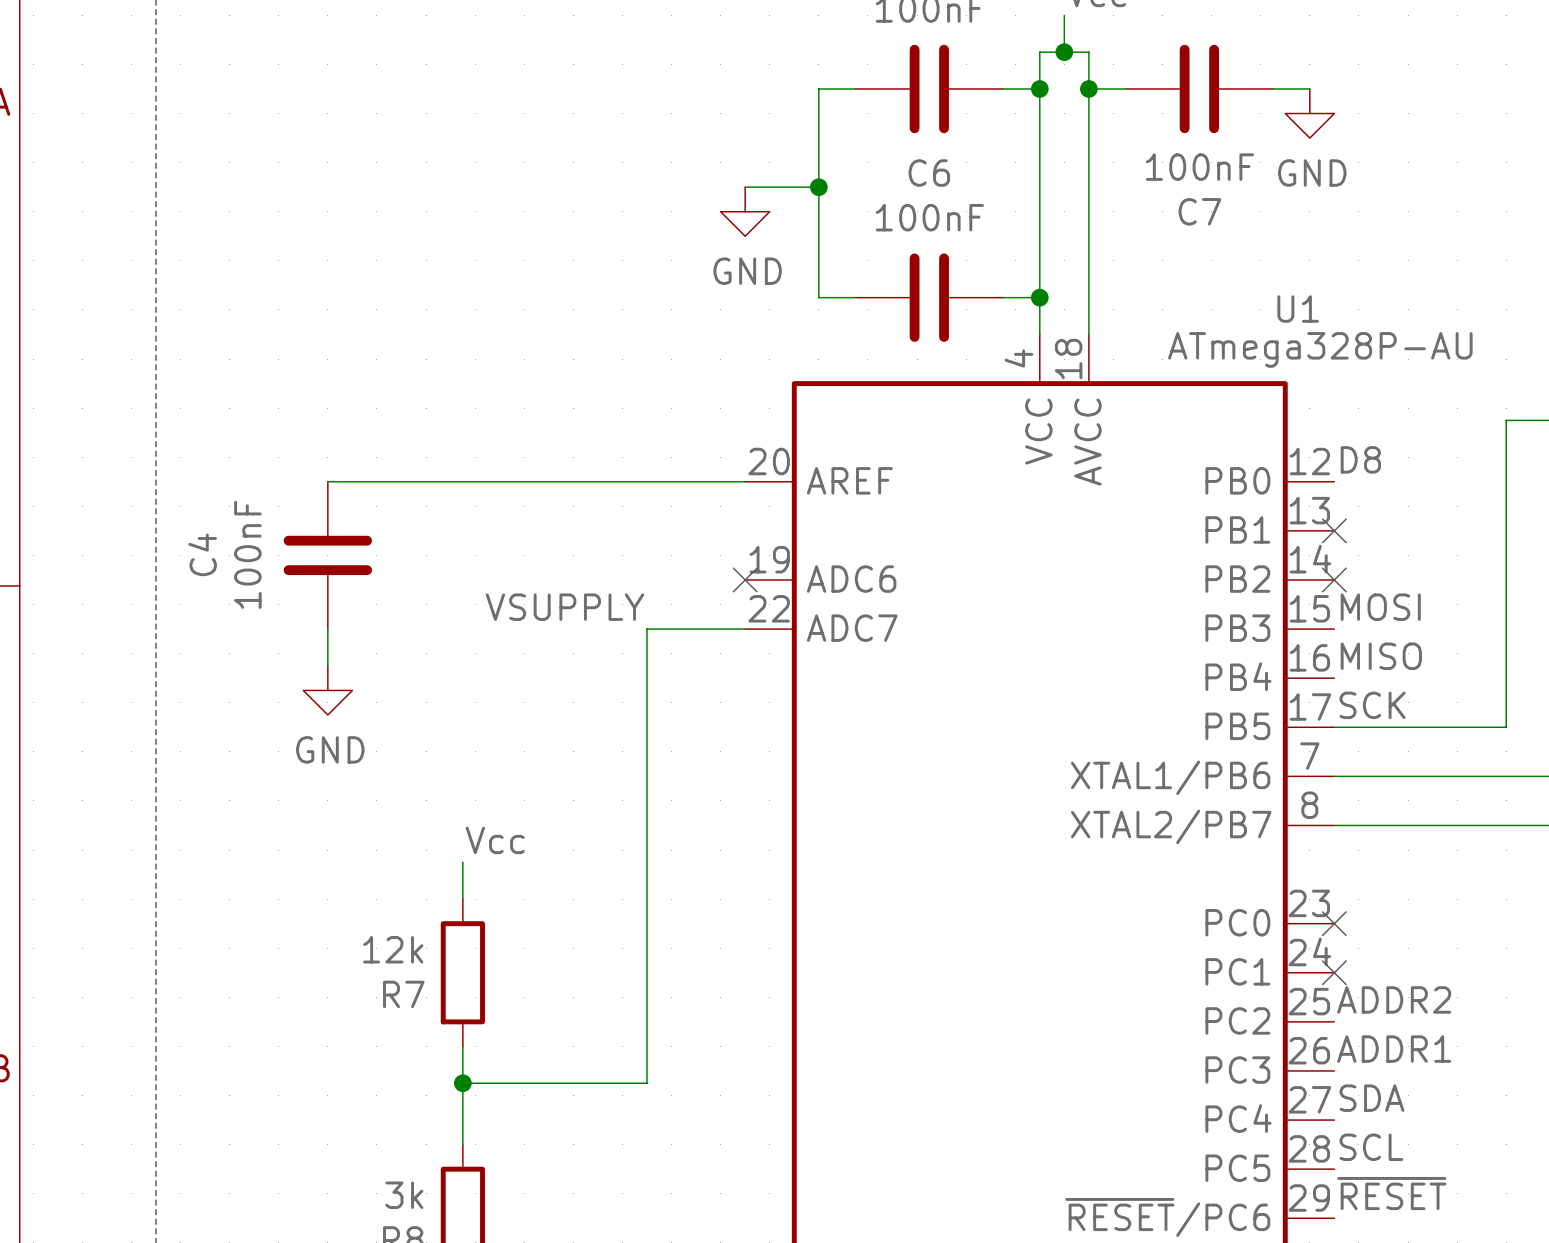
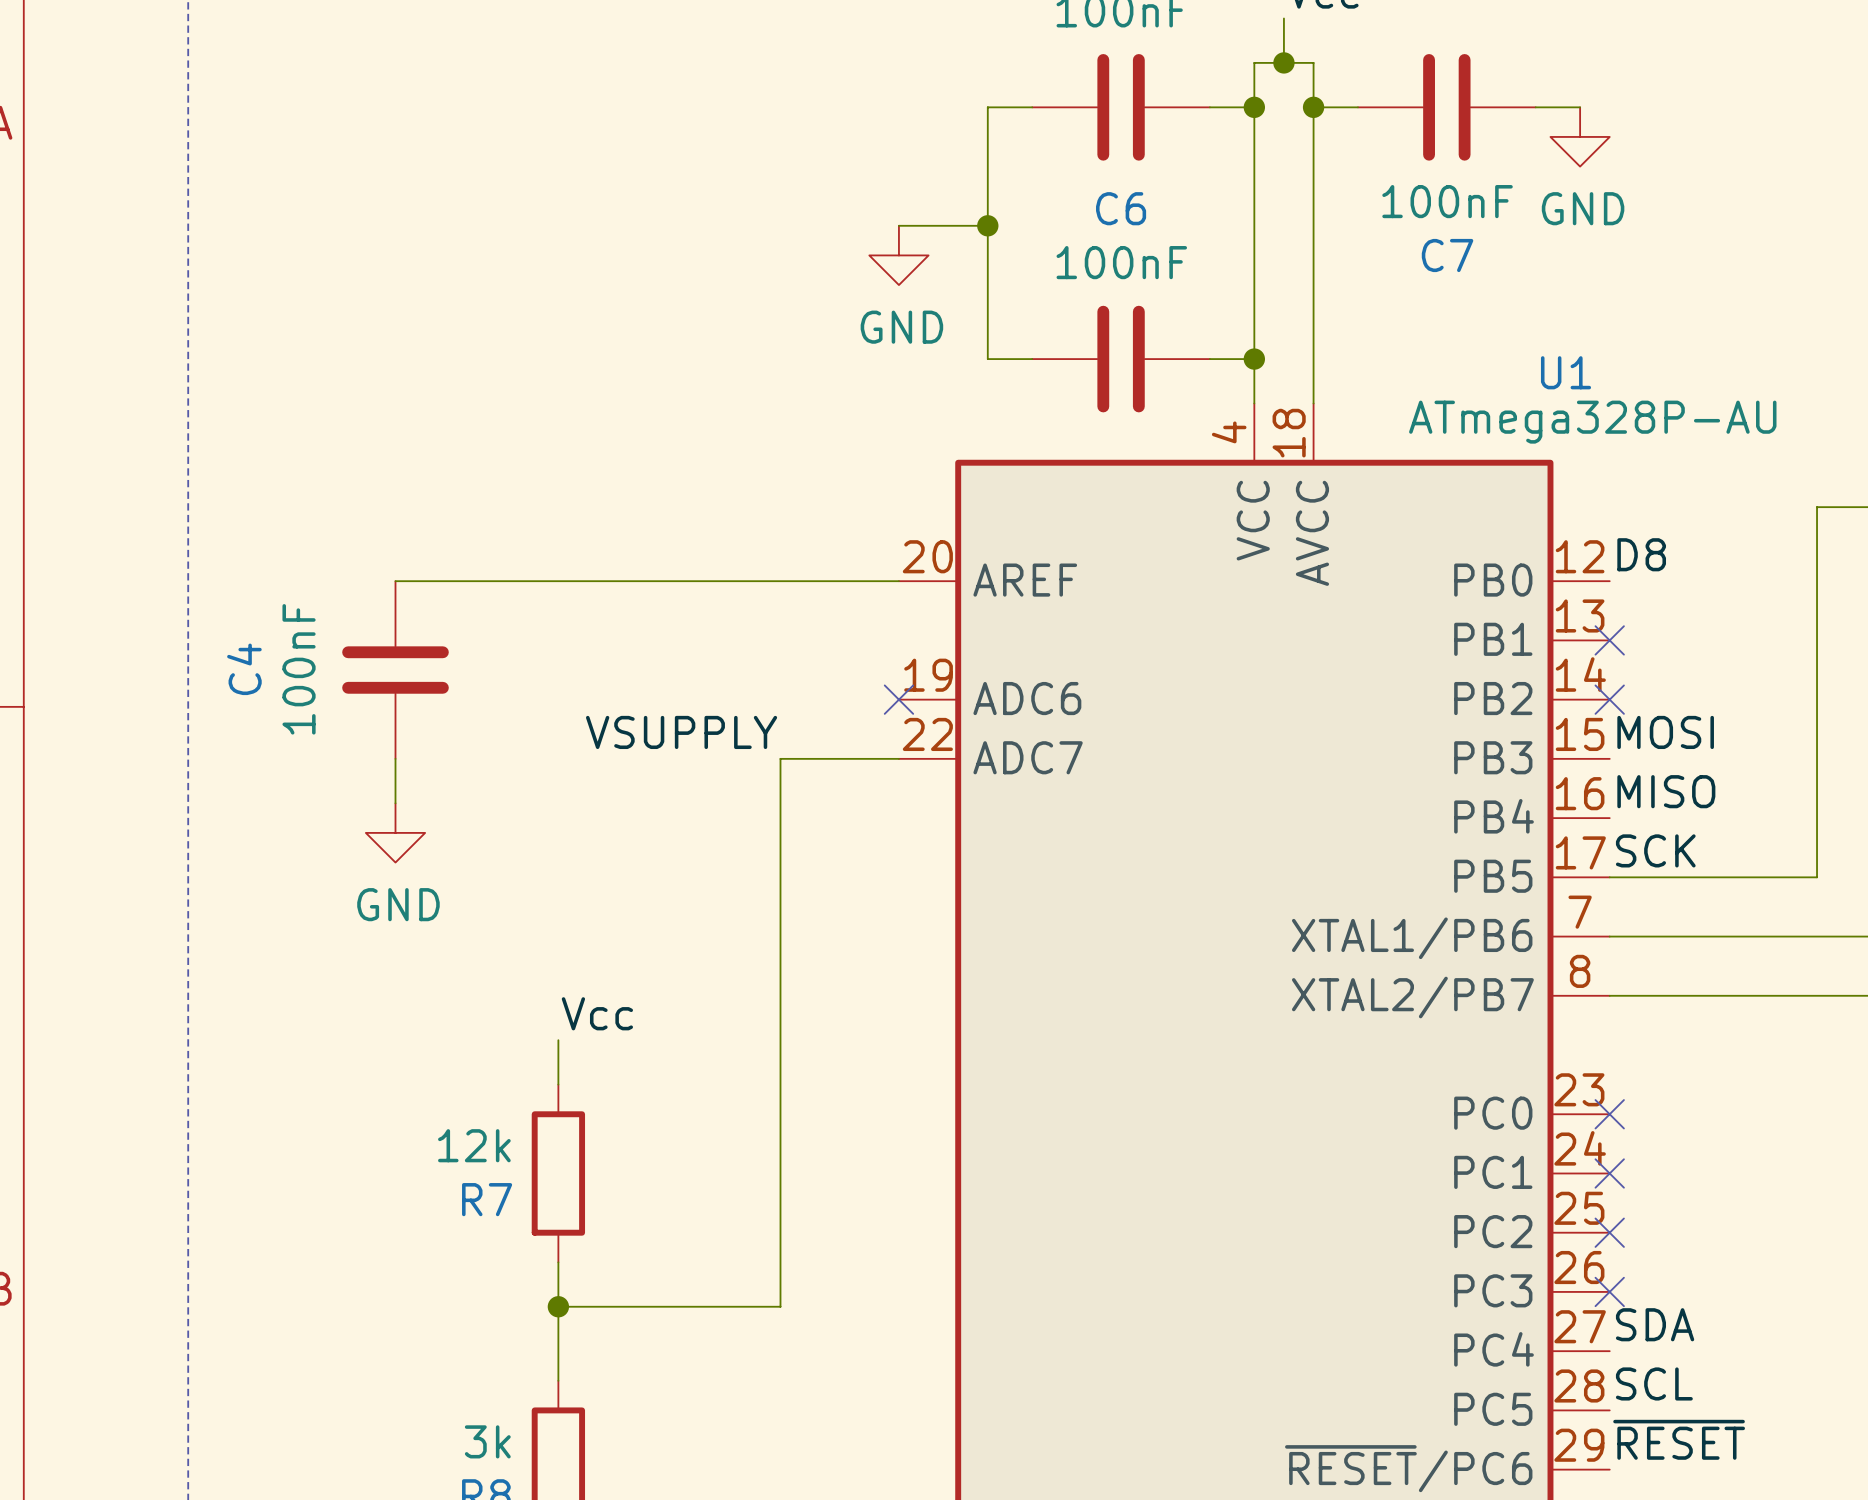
label: ADDR2 (1394, 999) -> none
no-connect mark: none -> (1609, 1232)
label: ADDR1 (1394, 1049) -> none
no-connect mark: none -> (1609, 1291)

